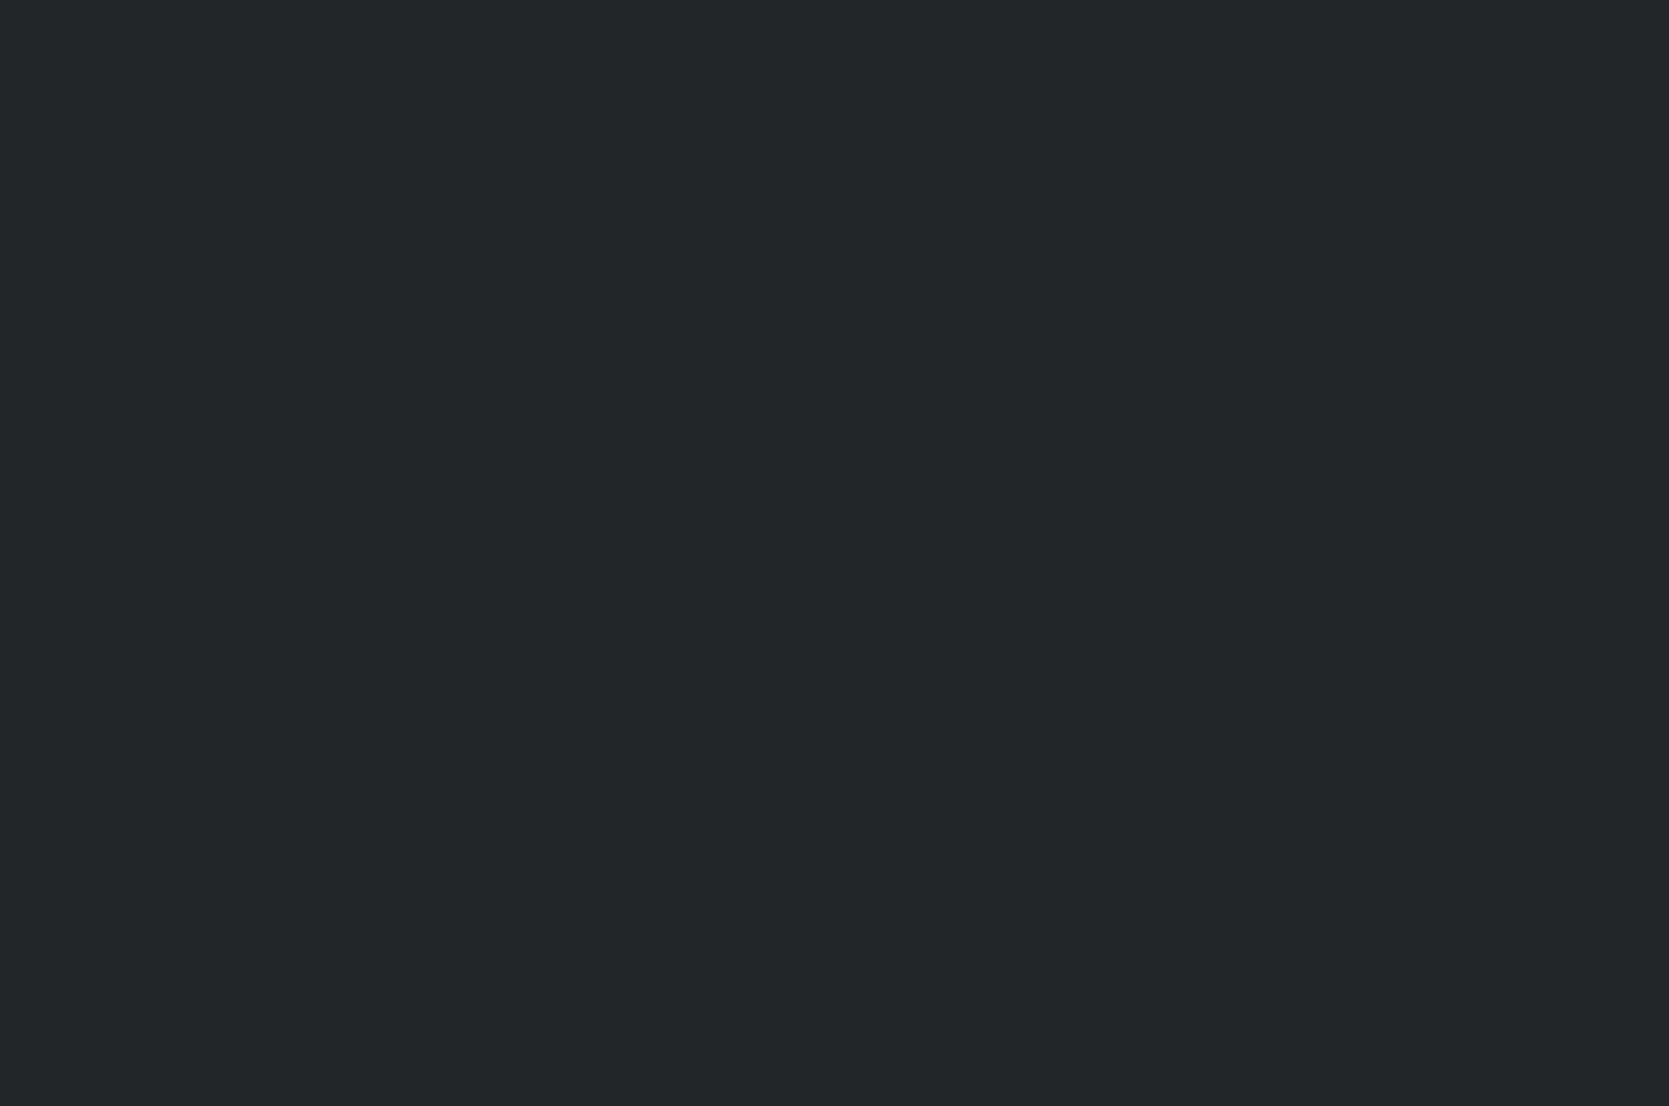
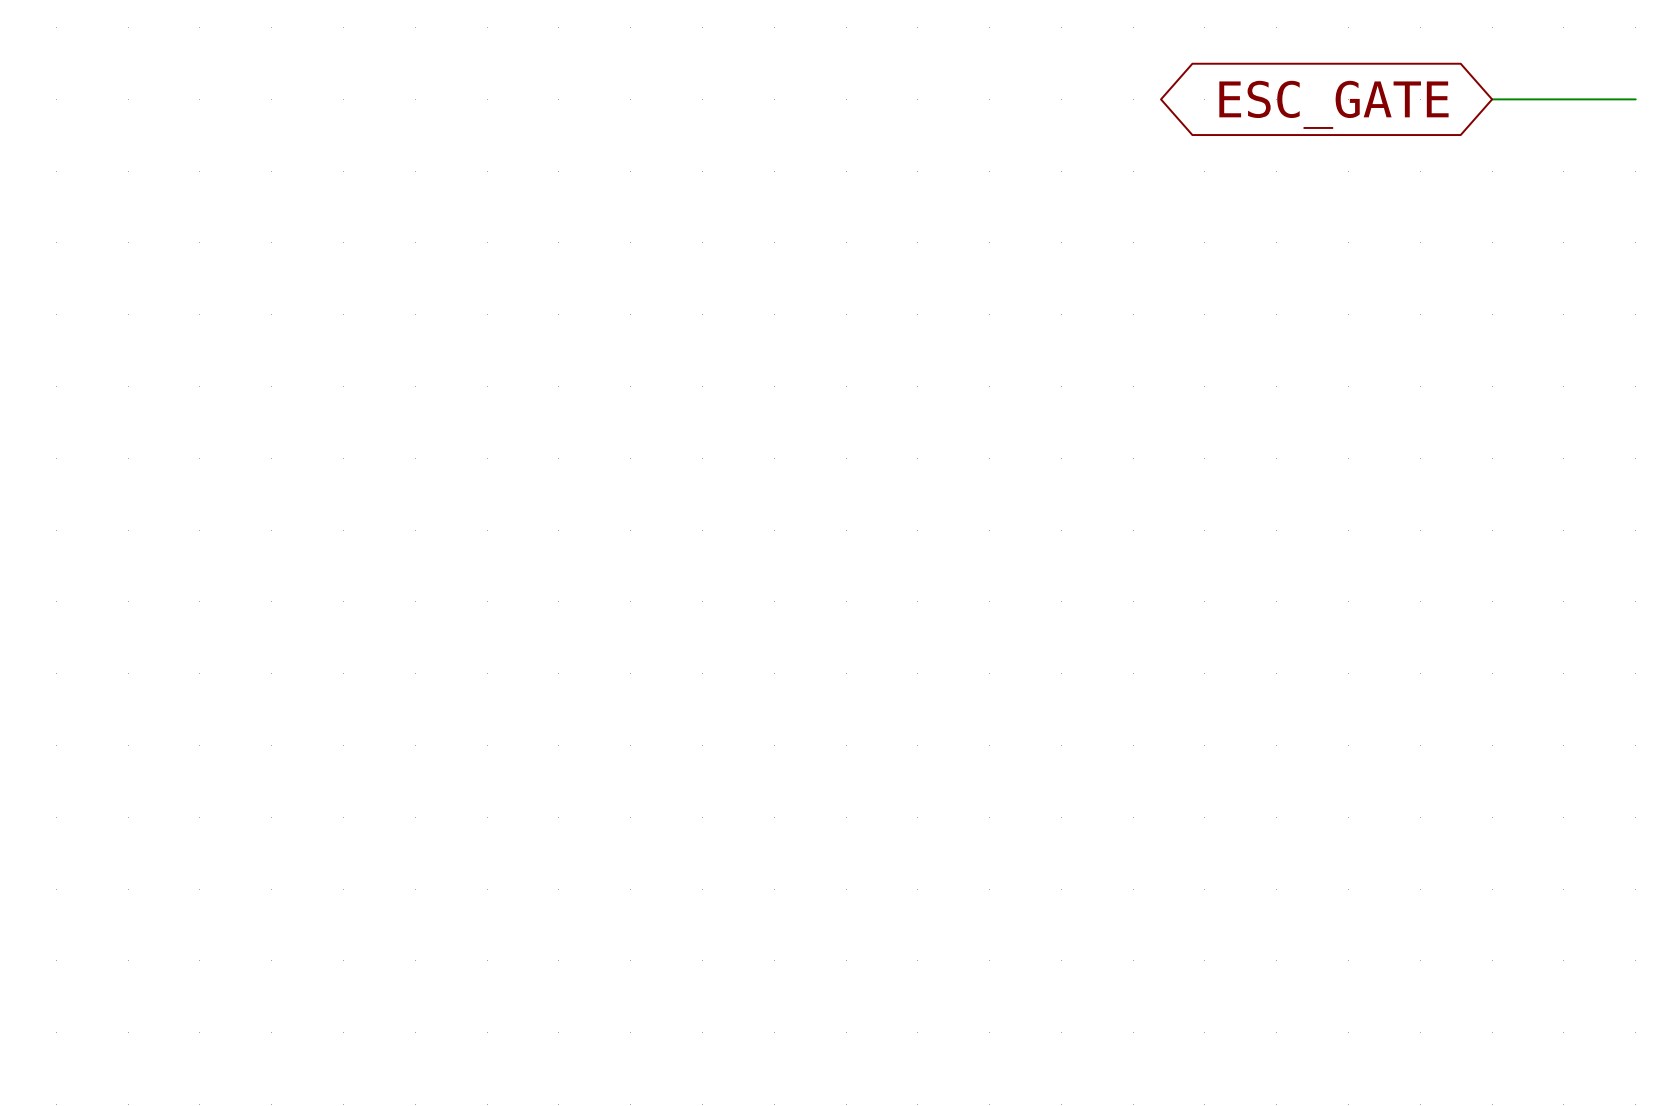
wire: none -> (1492, 99) (1635, 99)
global label: none -> ESC_GATE (1333, 104)

